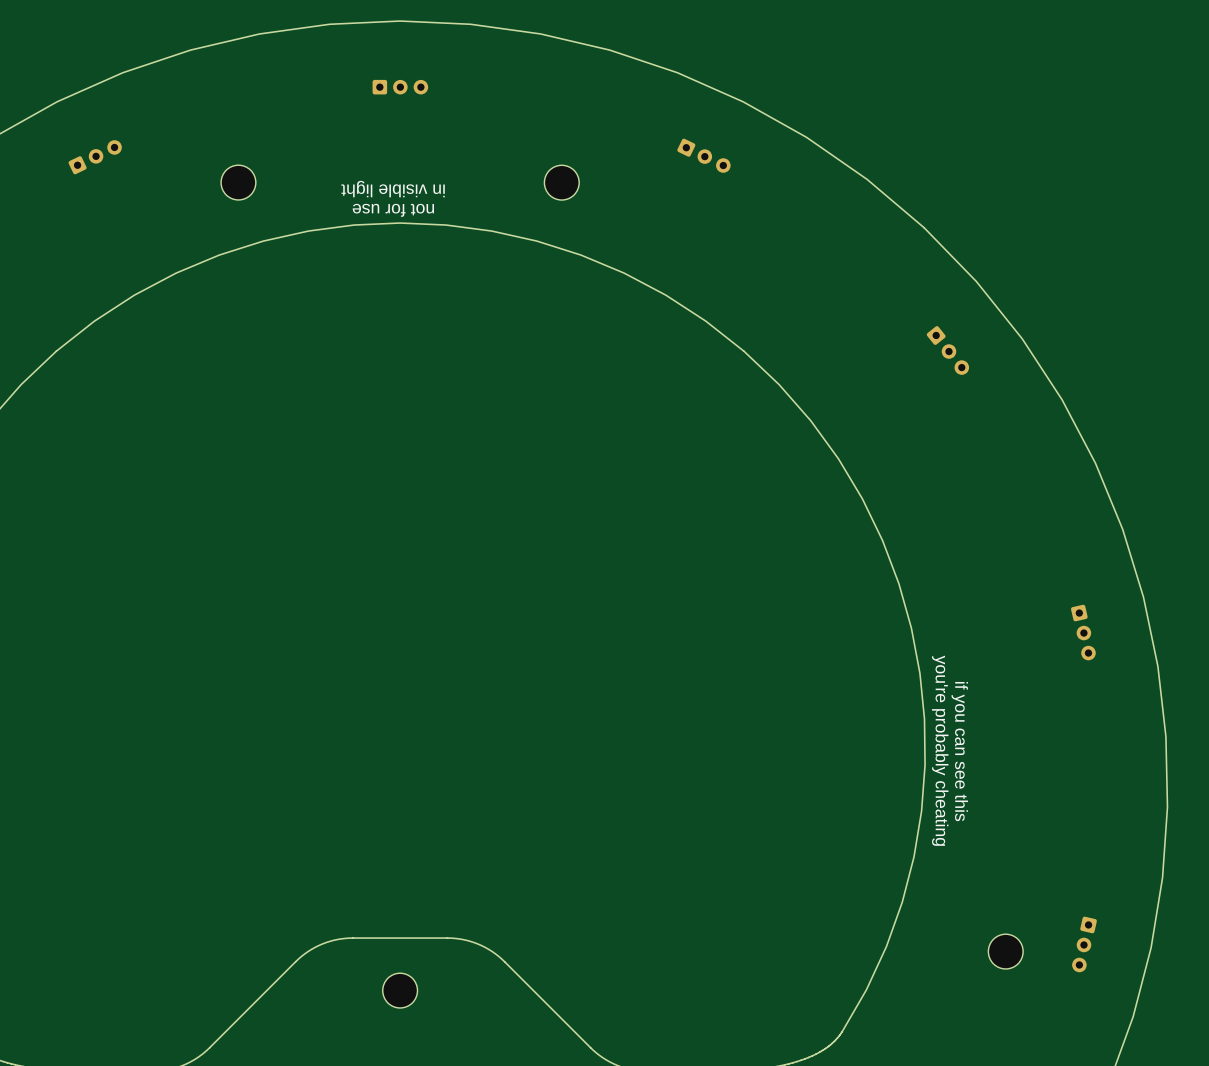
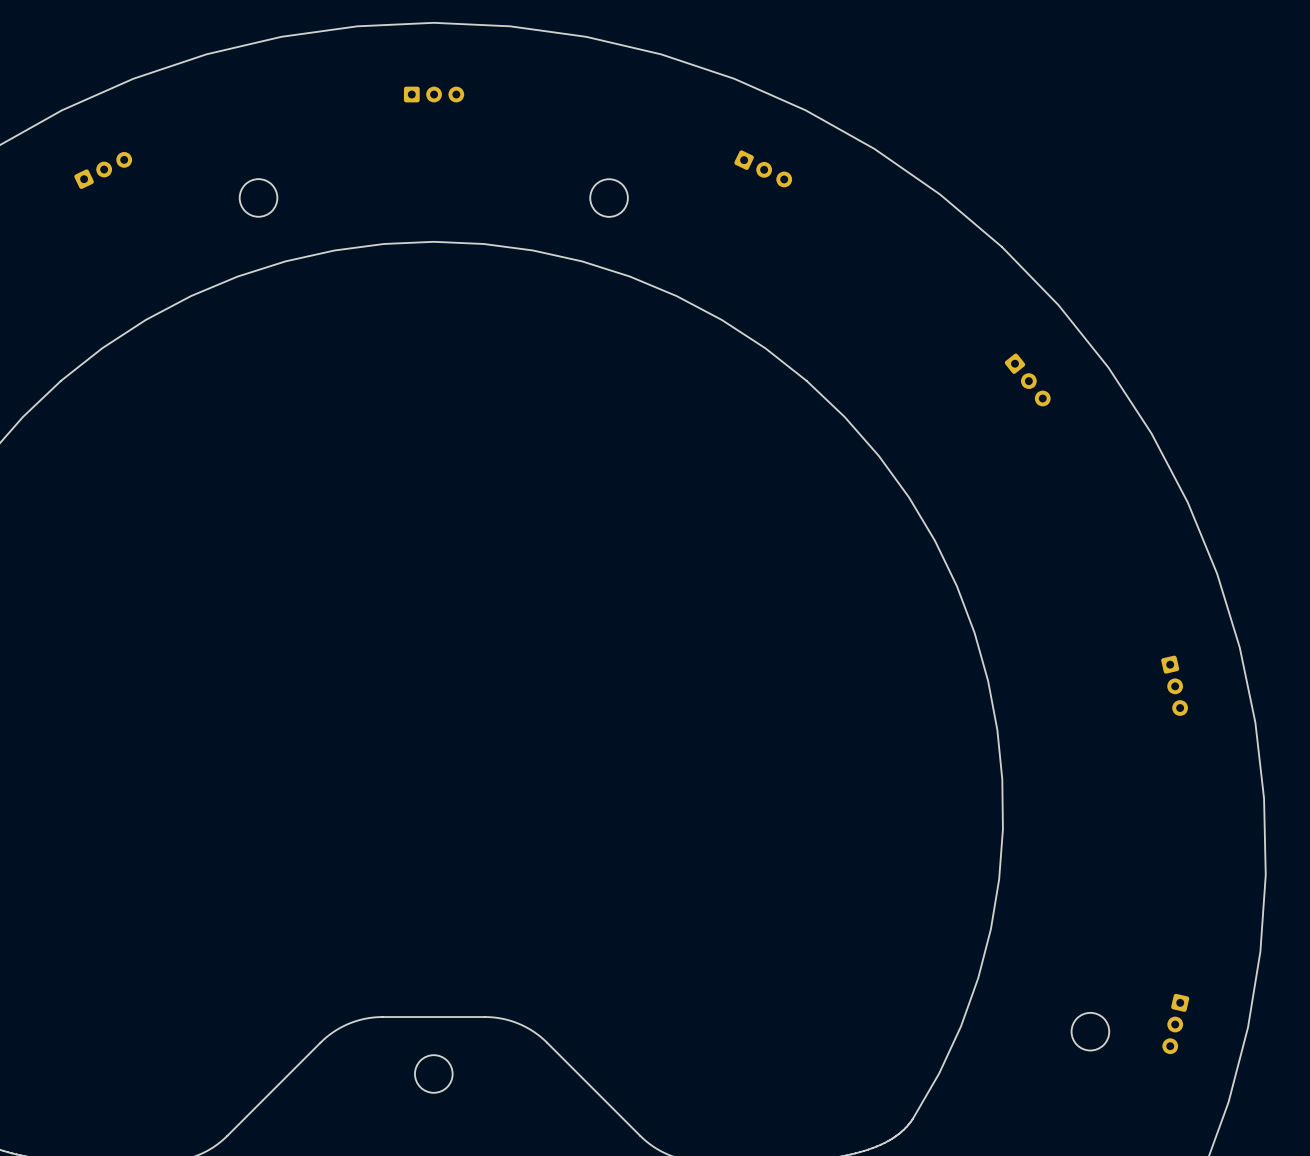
text: in visible light (393, 189) -> none
text: not for use (393, 210) -> none
text: you're probably cheating (940, 750) -> none
text: if you can see this (959, 751) -> none

